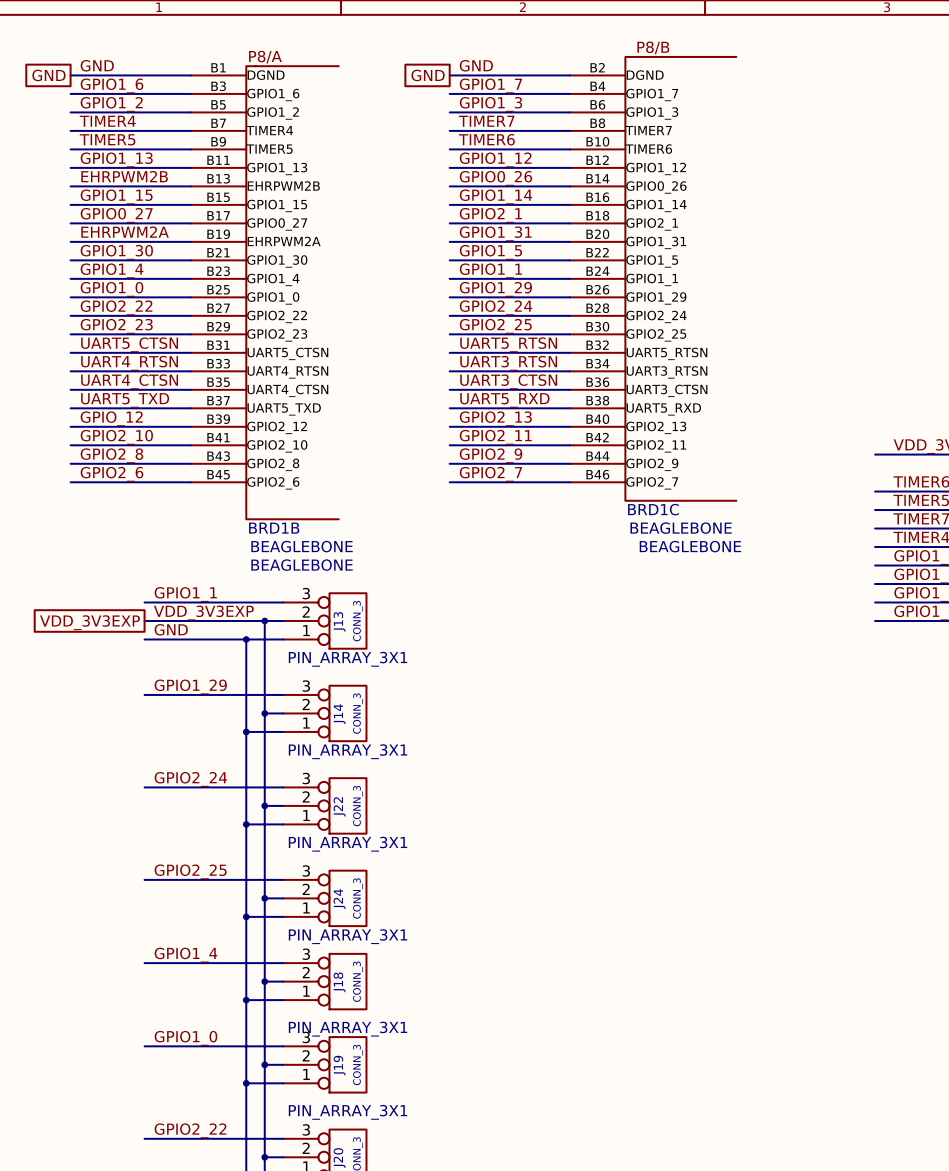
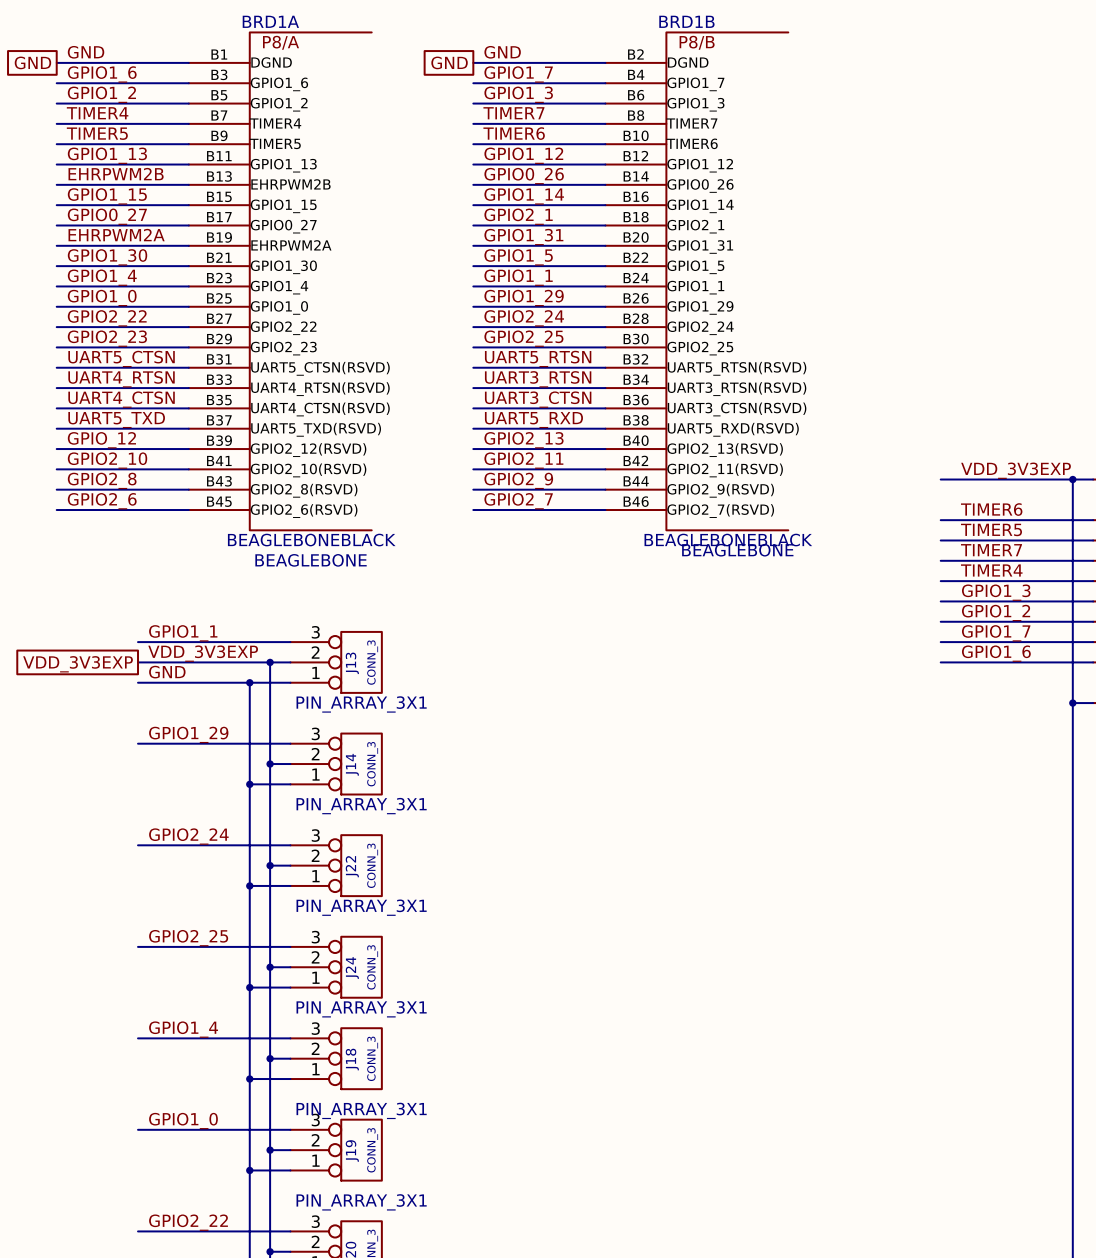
BRD1B symbol: [190, 66, 339, 520] -> [605, 32, 789, 531]
BRD1A: none -> BEAGLEBONEBLACK (280, 281)
BRD1C: BEAGLEBONE (653, 278) -> none
BRD1B name position: BRD1B (274, 528) -> BRD1B (686, 21)
BRD1B value: BEAGLEBONE (302, 546) -> BEAGLEBONEBLACK (728, 540)
BRD1B text position: BEAGLEBONE (302, 565) -> BEAGLEBONE (737, 550)

